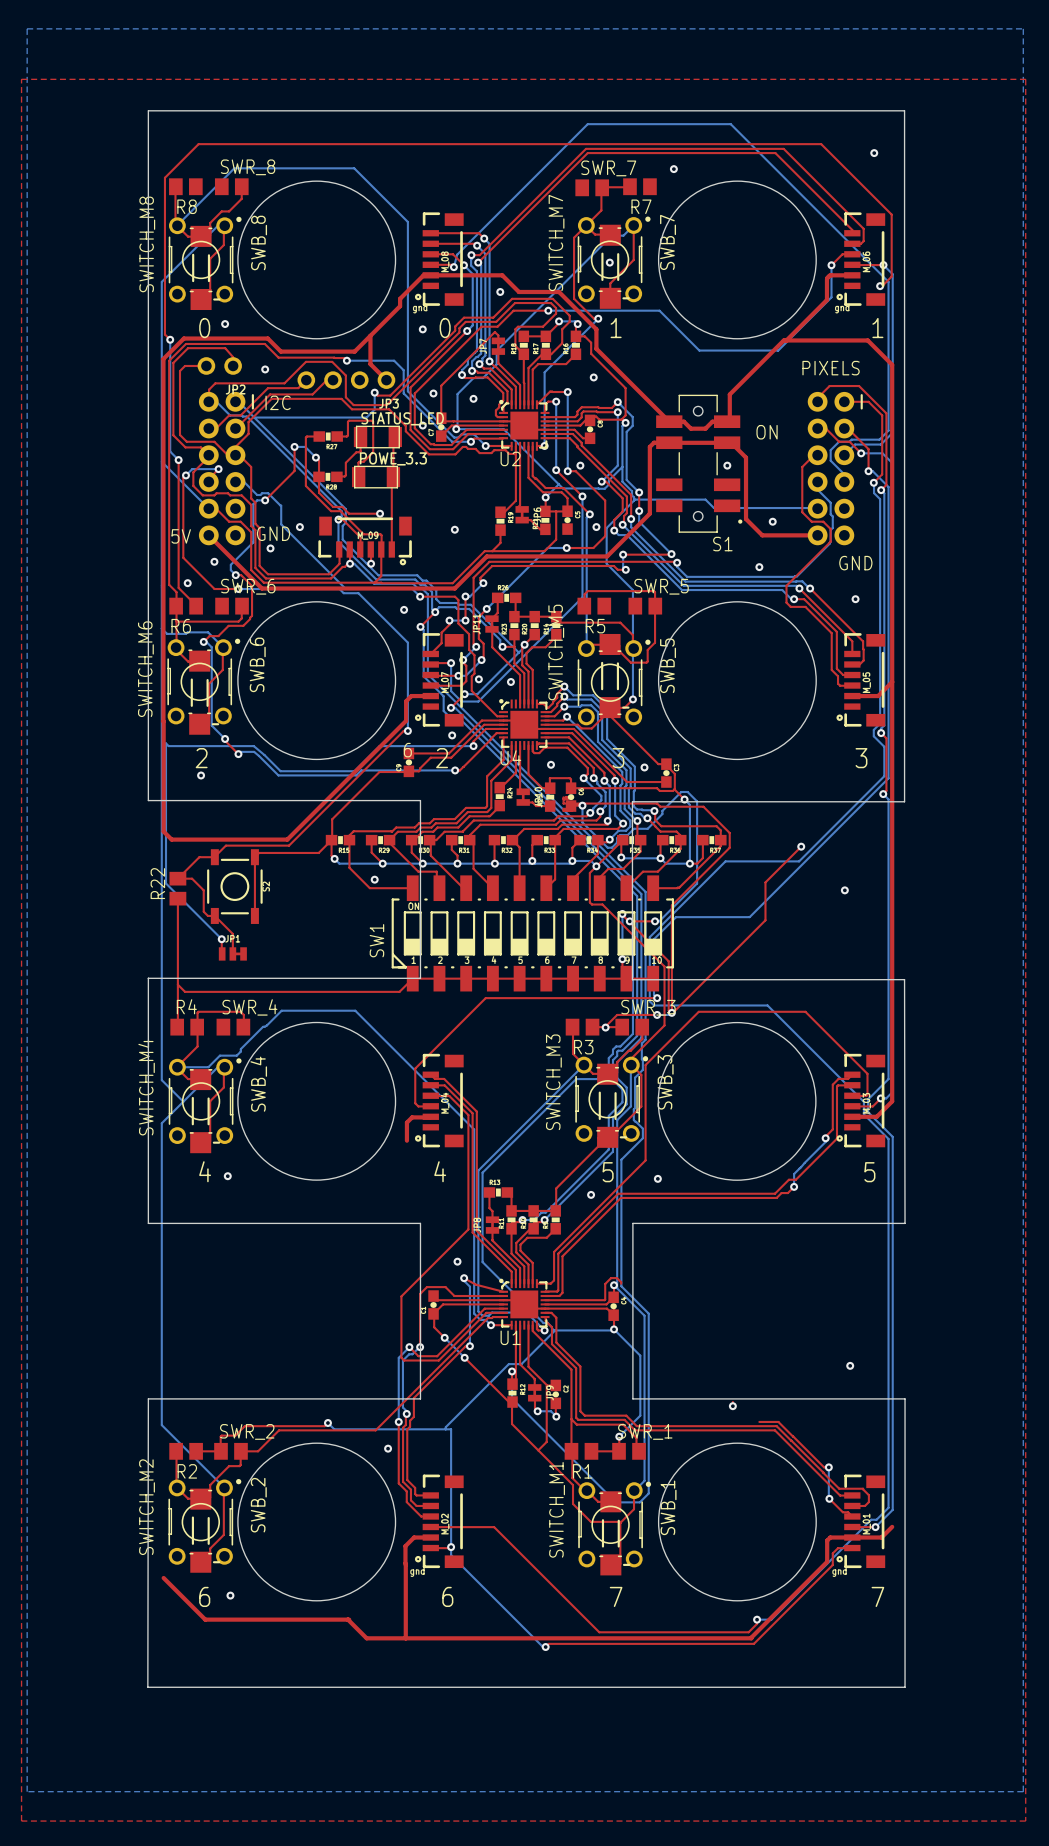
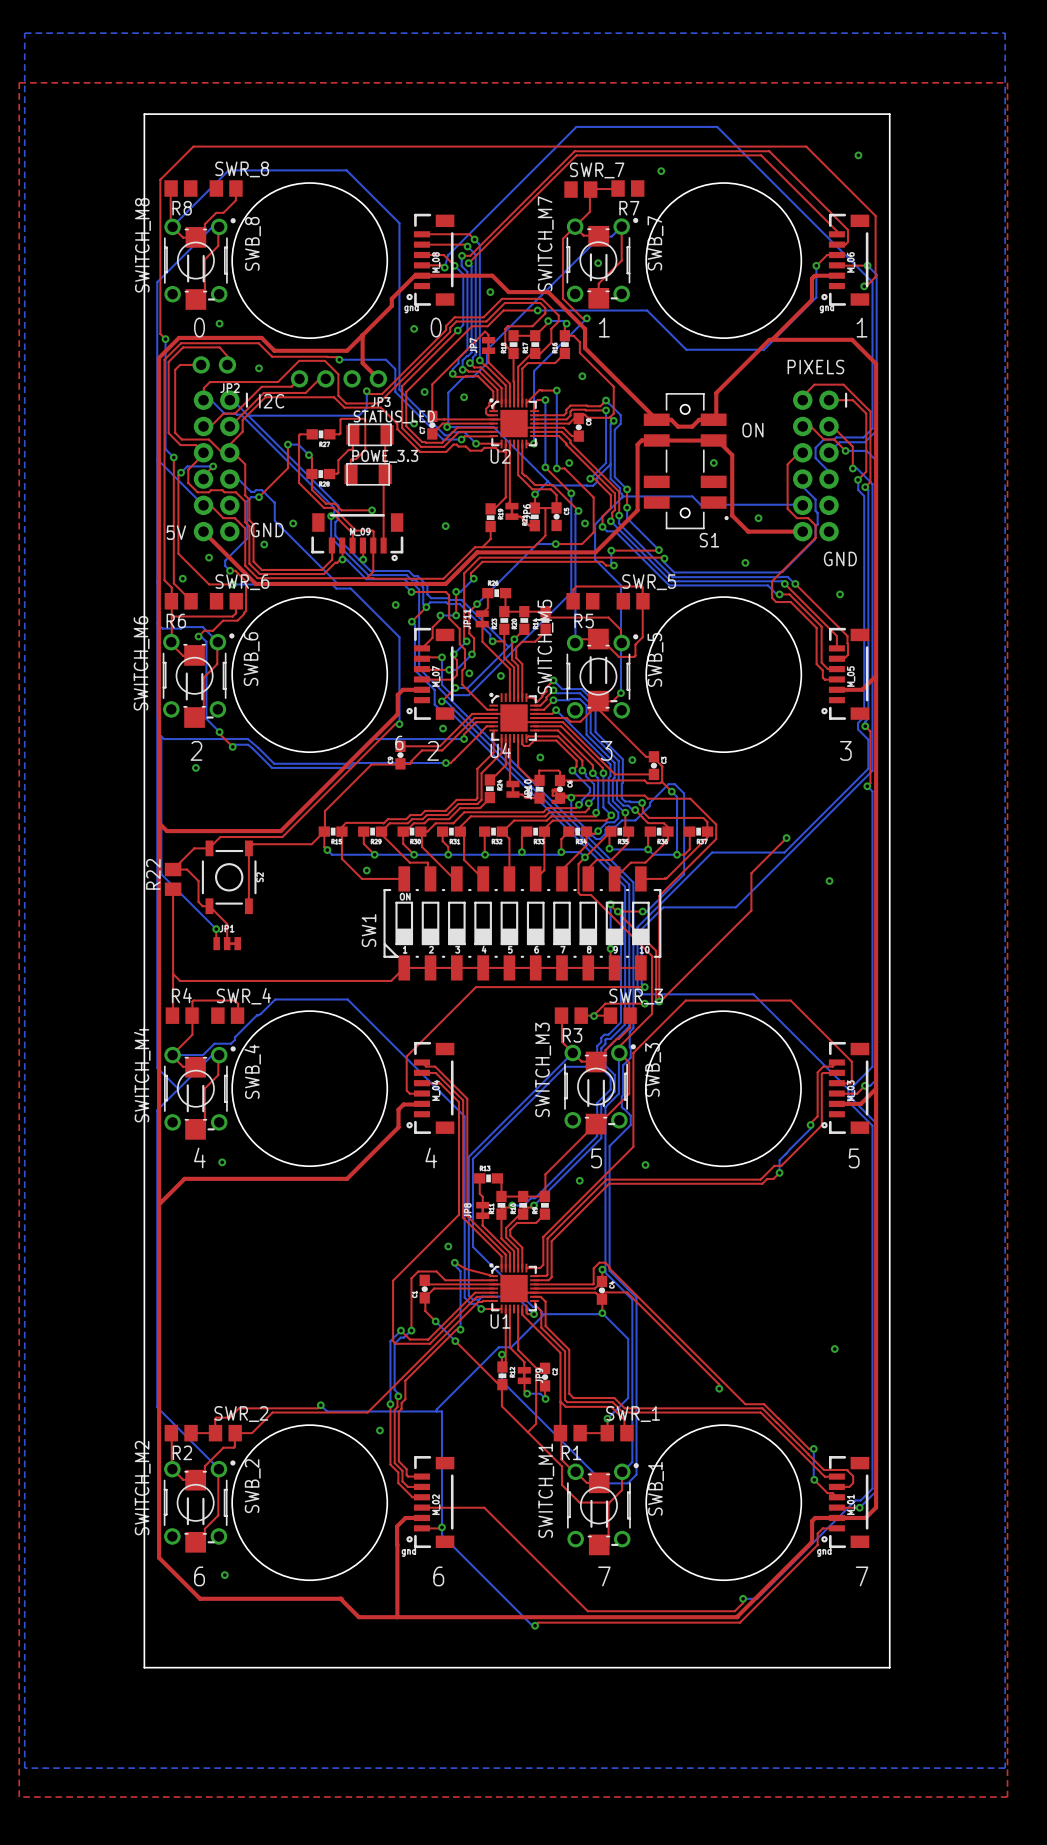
board edge: (148, 110) (148, 800) (420, 800) (420, 978) (148, 978) (148, 1223) (420, 1223) (420, 1398) (148, 1398) (147, 1687) (905, 1687) (905, 1398) (632, 1398) (632, 1223) (905, 1223) (904, 979) (632, 979) (632, 801) (904, 801) (904, 110) (148, 110) -> (144, 114) (144, 1667) (889, 1667) (889, 114) (144, 114)
top track: none -> (159, 823) (159, 1557)
top track: none -> (876, 1088) (876, 1507)
top track: none -> (398, 1127) (347, 1178) (184, 1178) (159, 1204)
top track: none -> (609, 1268) (745, 1404)
top track: none -> (602, 1292) (627, 1292) (719, 1384)

